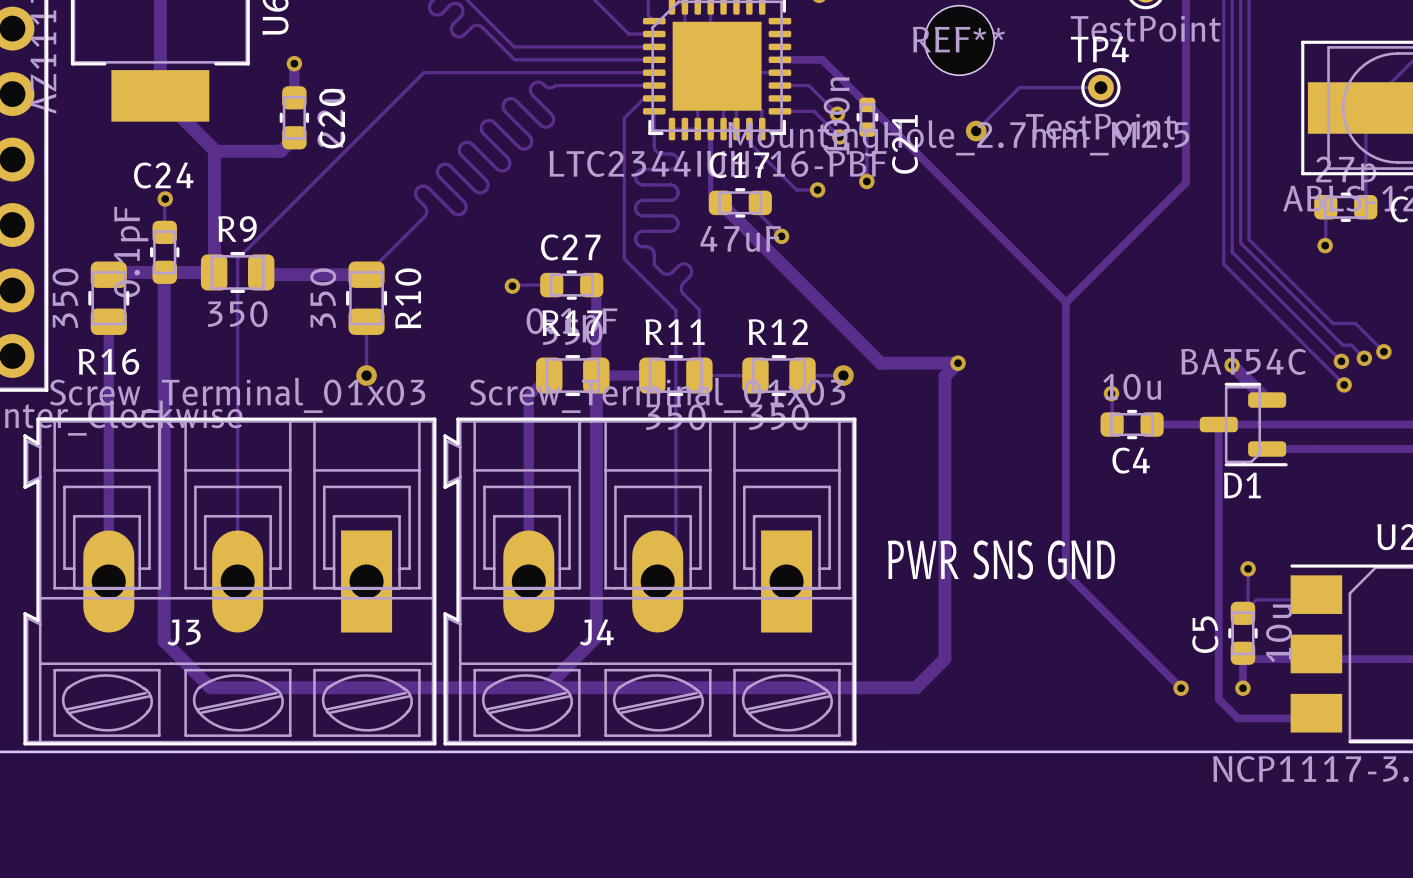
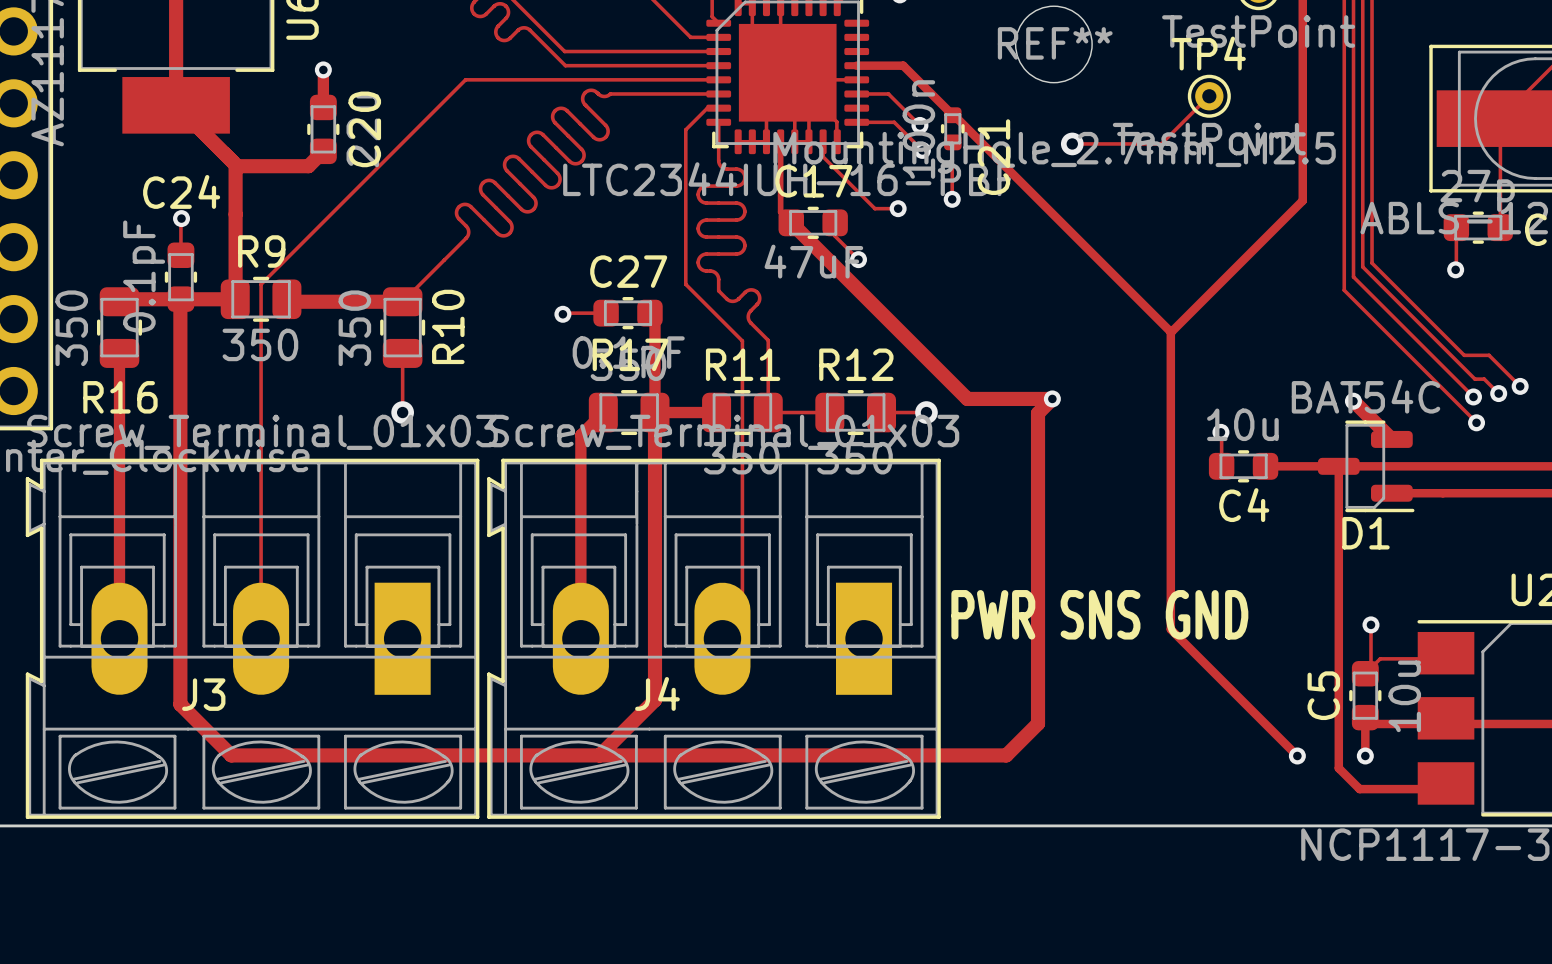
track: (1100, 87) (1019, 87) (976, 131) -> (1209, 96) (1161, 143) (1072, 143)

